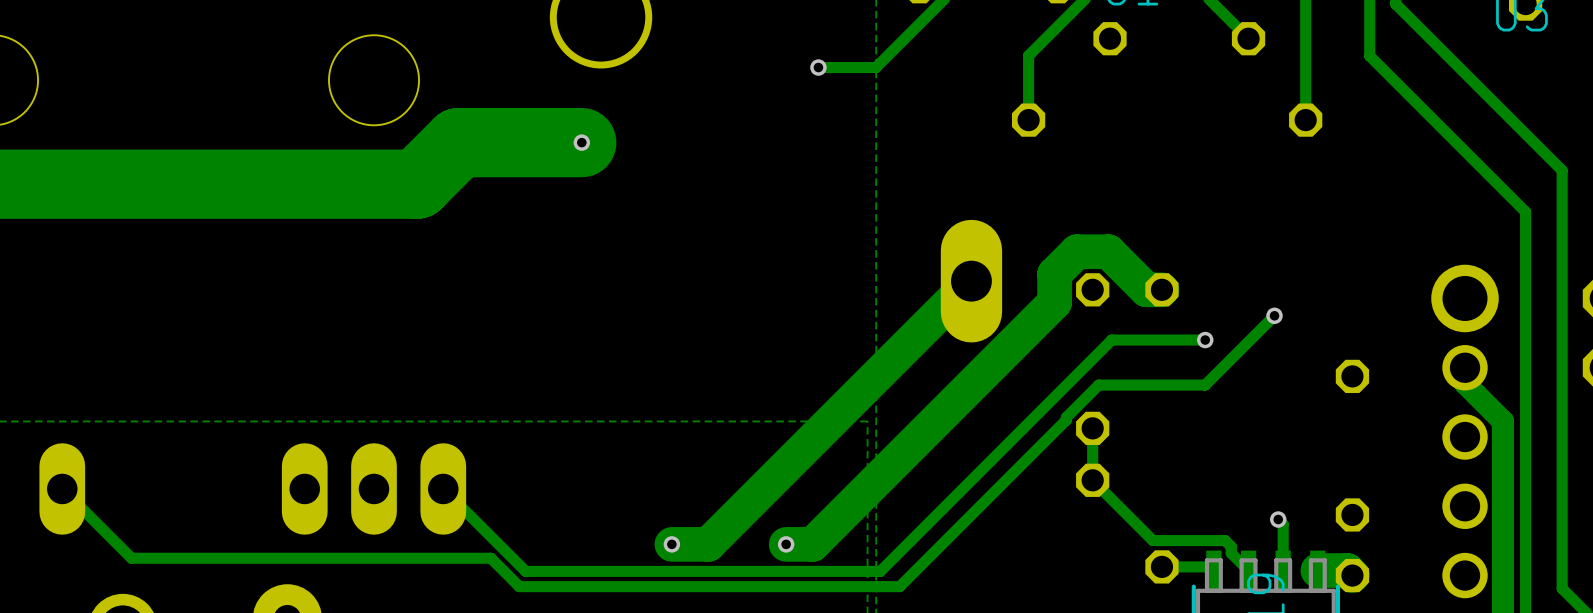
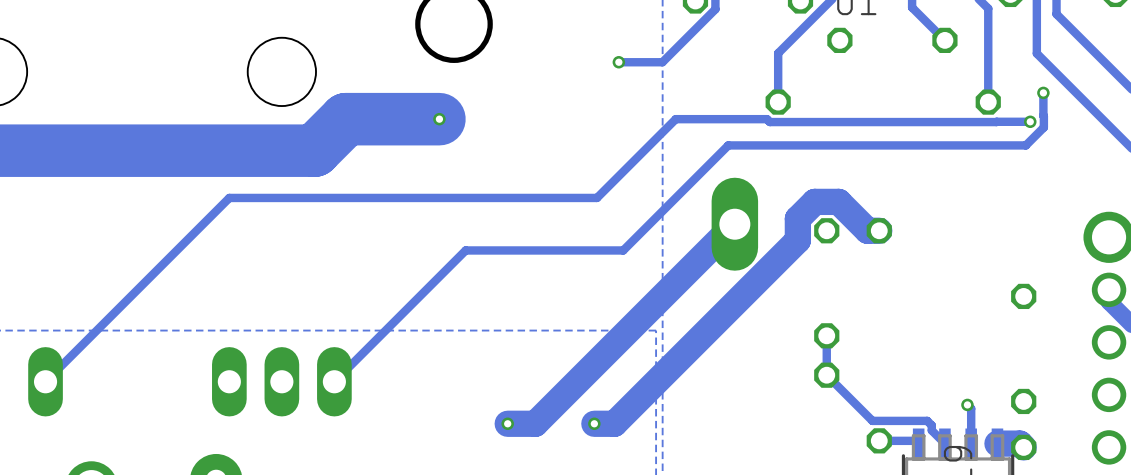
via: none -> (1043, 92)
track: none -> (1030, 121) (996, 121)
via: none -> (1030, 121)
track: (1274, 315) (1205, 385) (1098, 385) (1066, 417) (1066, 420) (899, 586) (519, 586) (490, 558) (131, 558) (62, 488) -> (996, 122) (769, 122) (767, 119) (675, 119) (596, 197) (229, 197) (45, 381)
via: (1274, 315) -> none
track: (1205, 340) (1111, 340) (880, 571) (525, 571) (443, 488) -> (1043, 92) (1043, 127) (1025, 145) (728, 145) (623, 250) (465, 250) (334, 381)
via: (1205, 340) -> none

